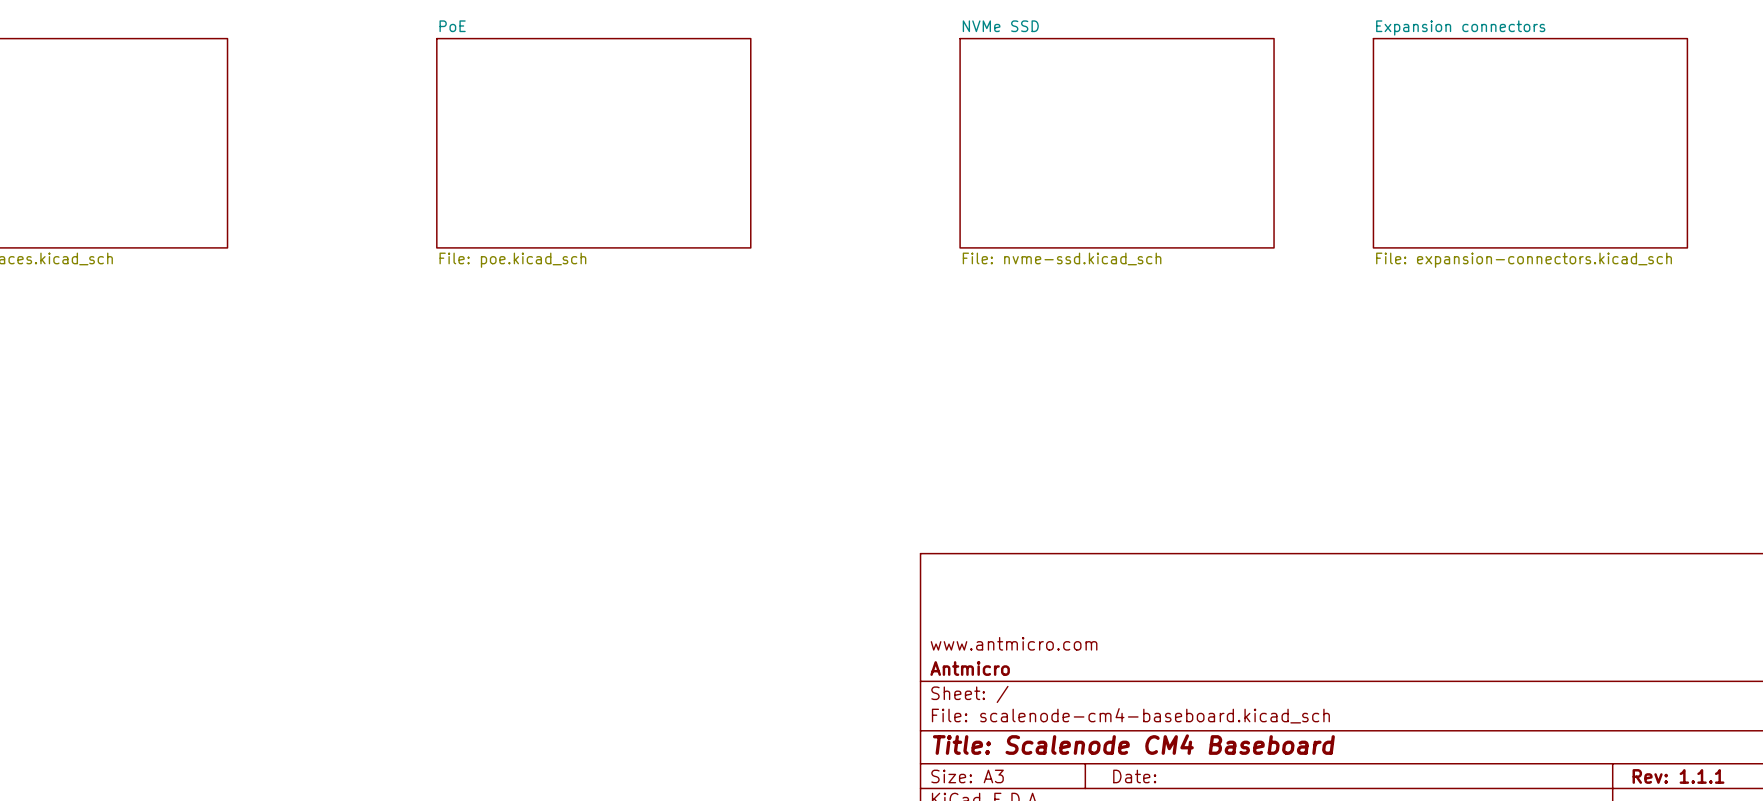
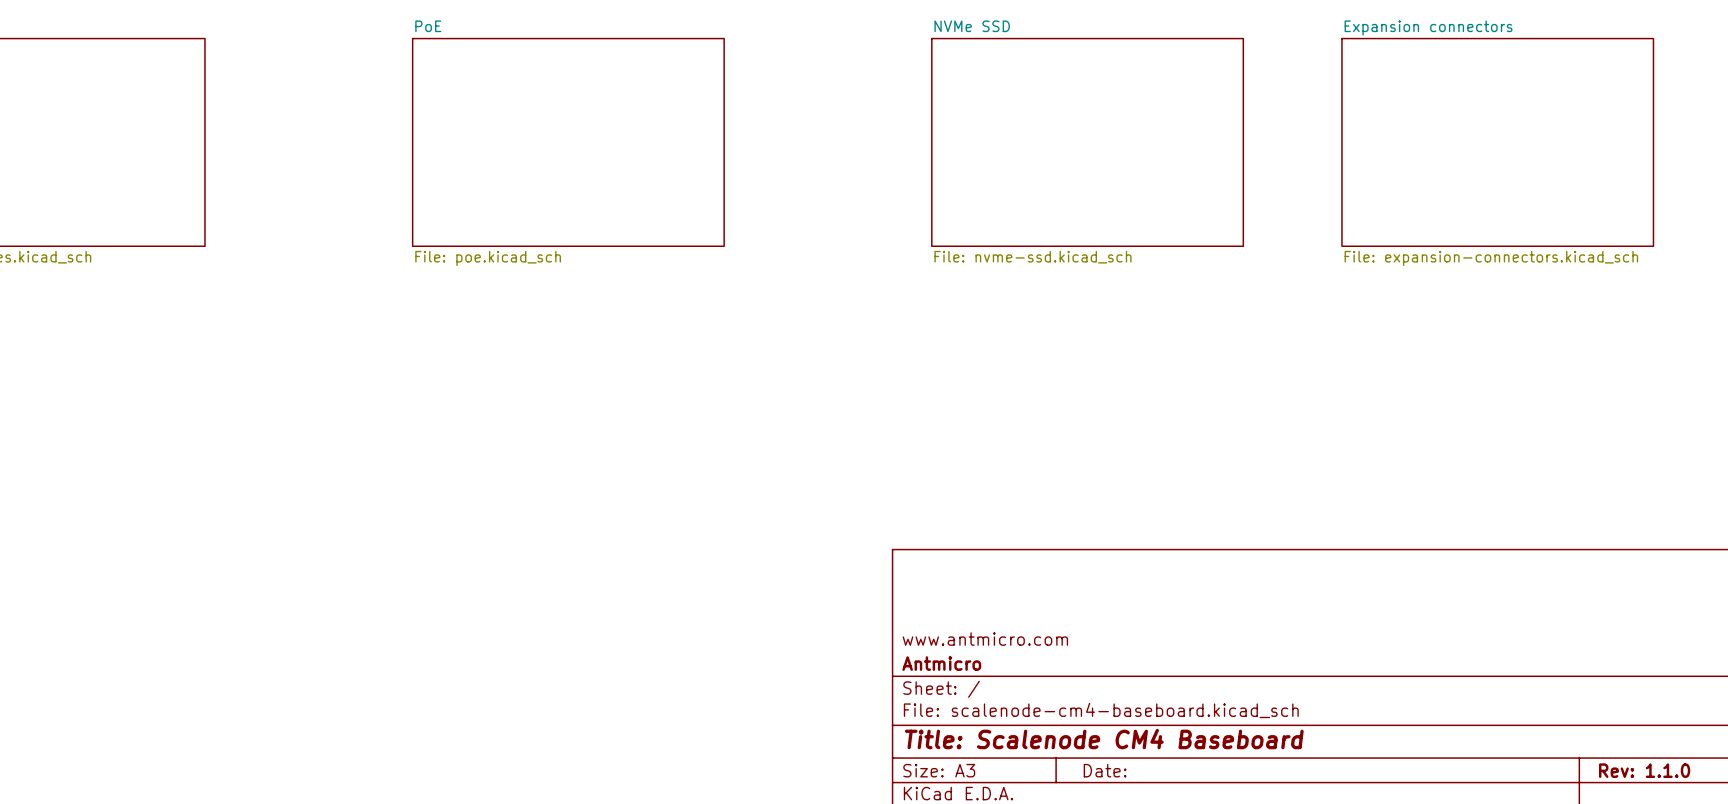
title block: Rev: 1.1.1 (1678, 776) -> Rev: 1.1.0 (1644, 770)

